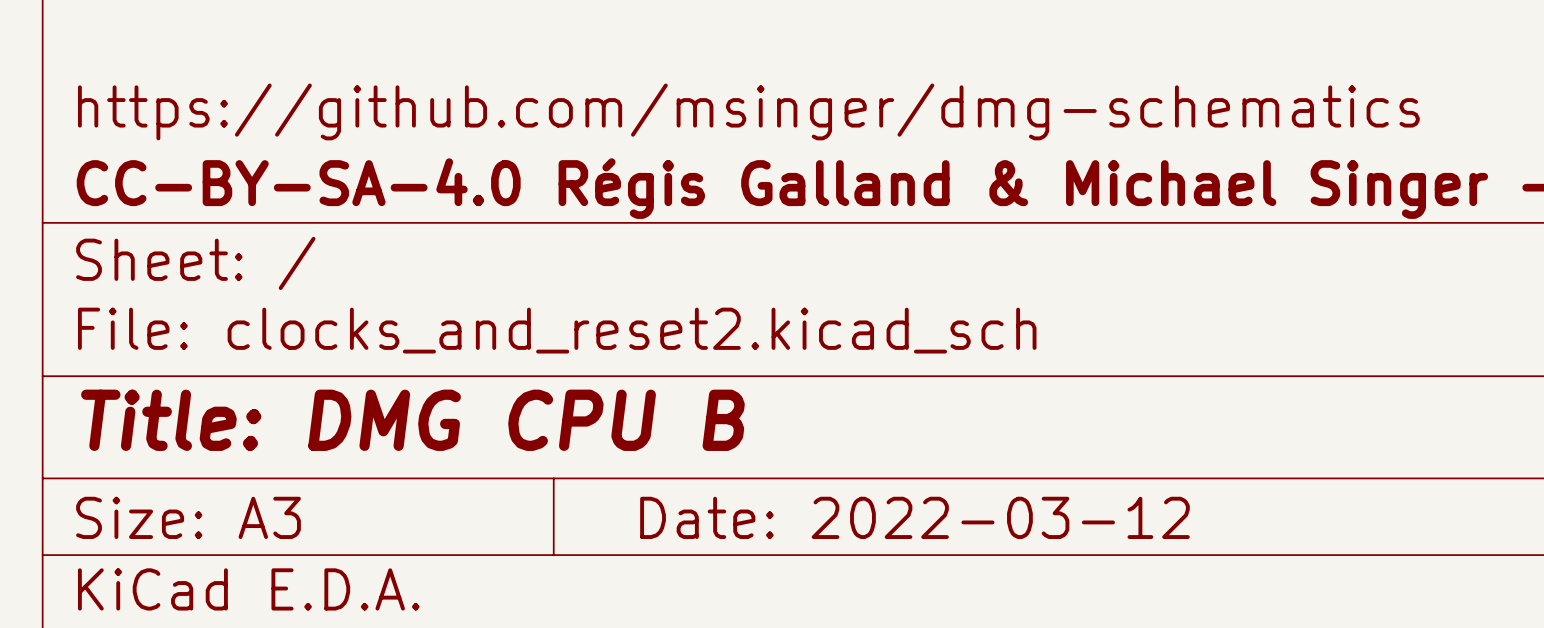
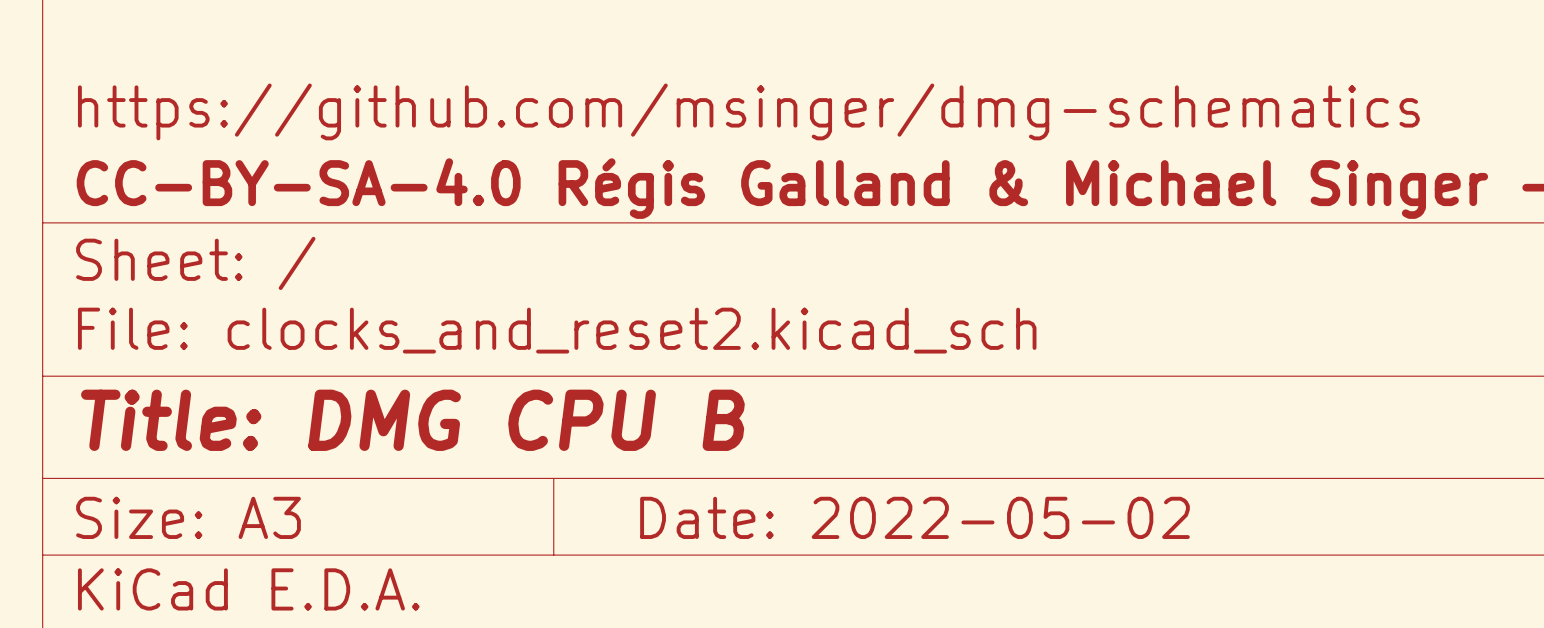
title block: Date: 2022-03-12 (914, 517) -> Date: 2022-05-02 (914, 517)

